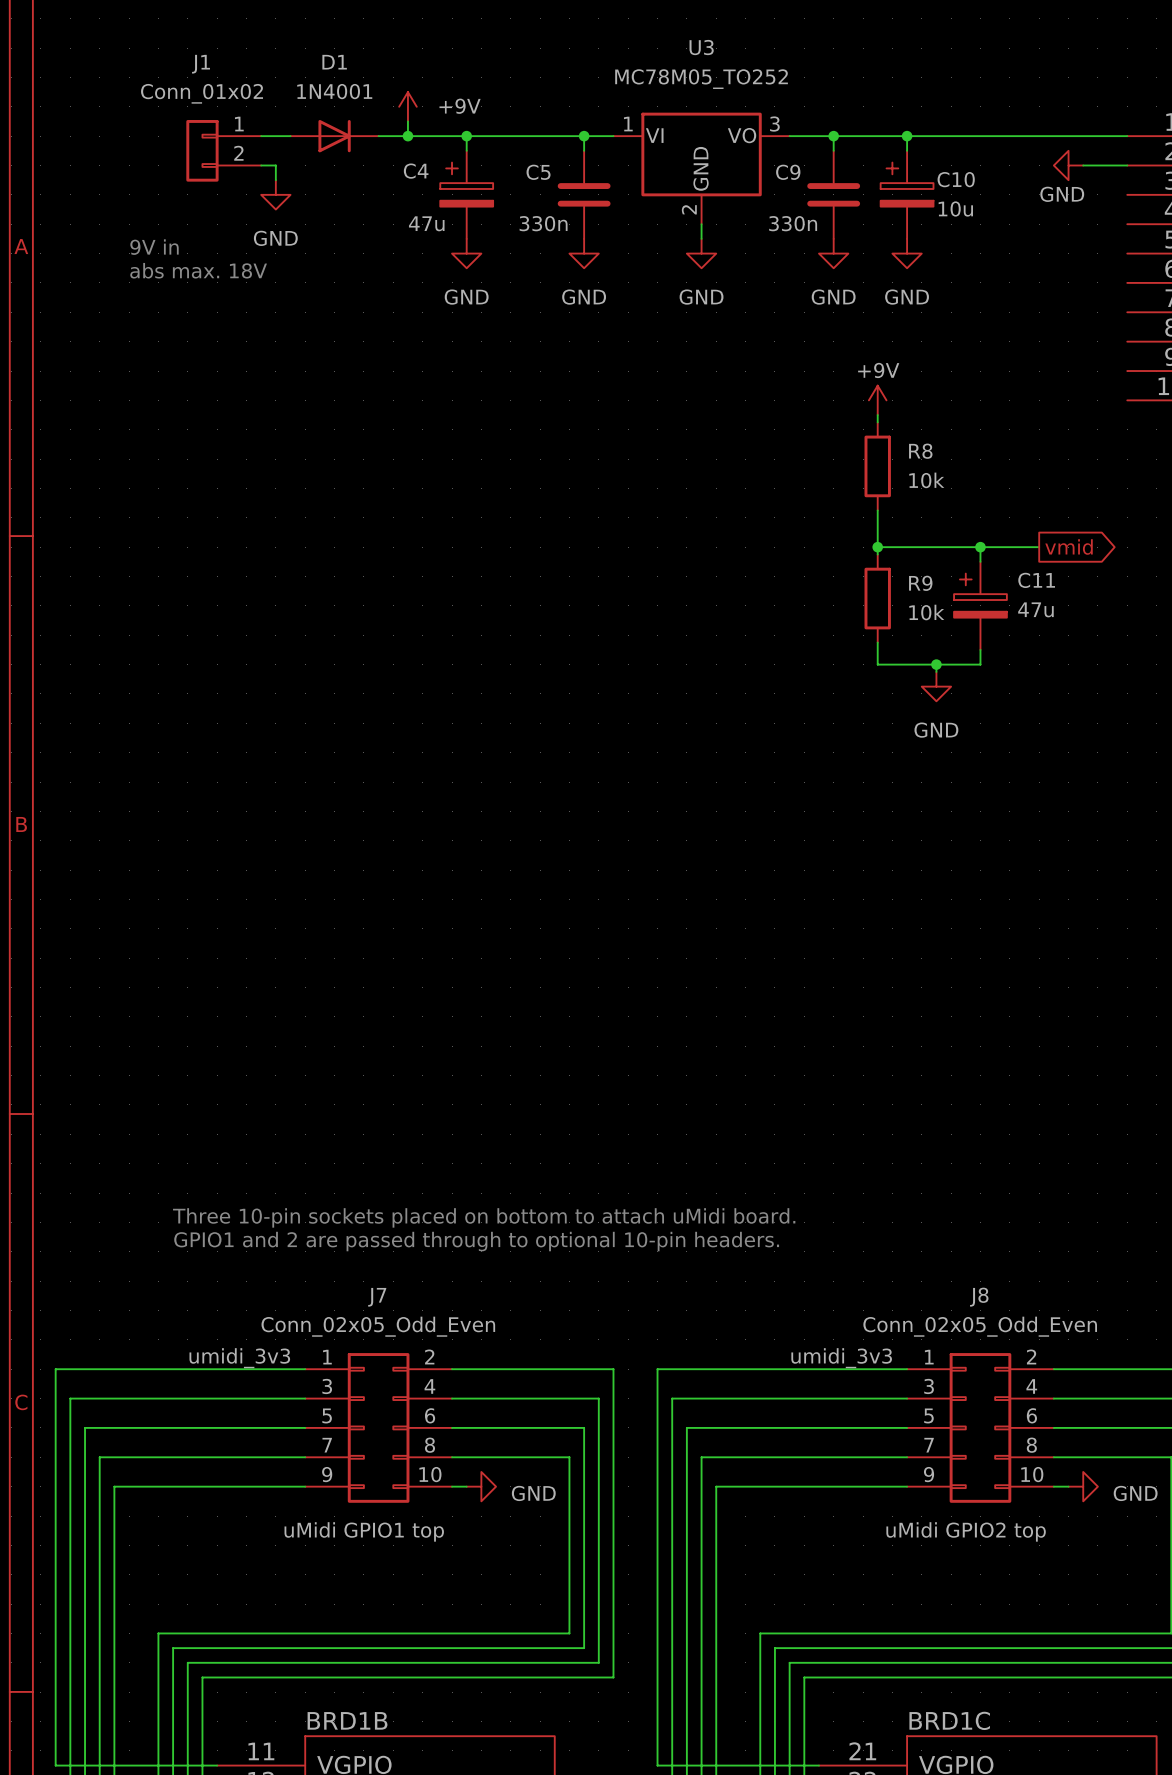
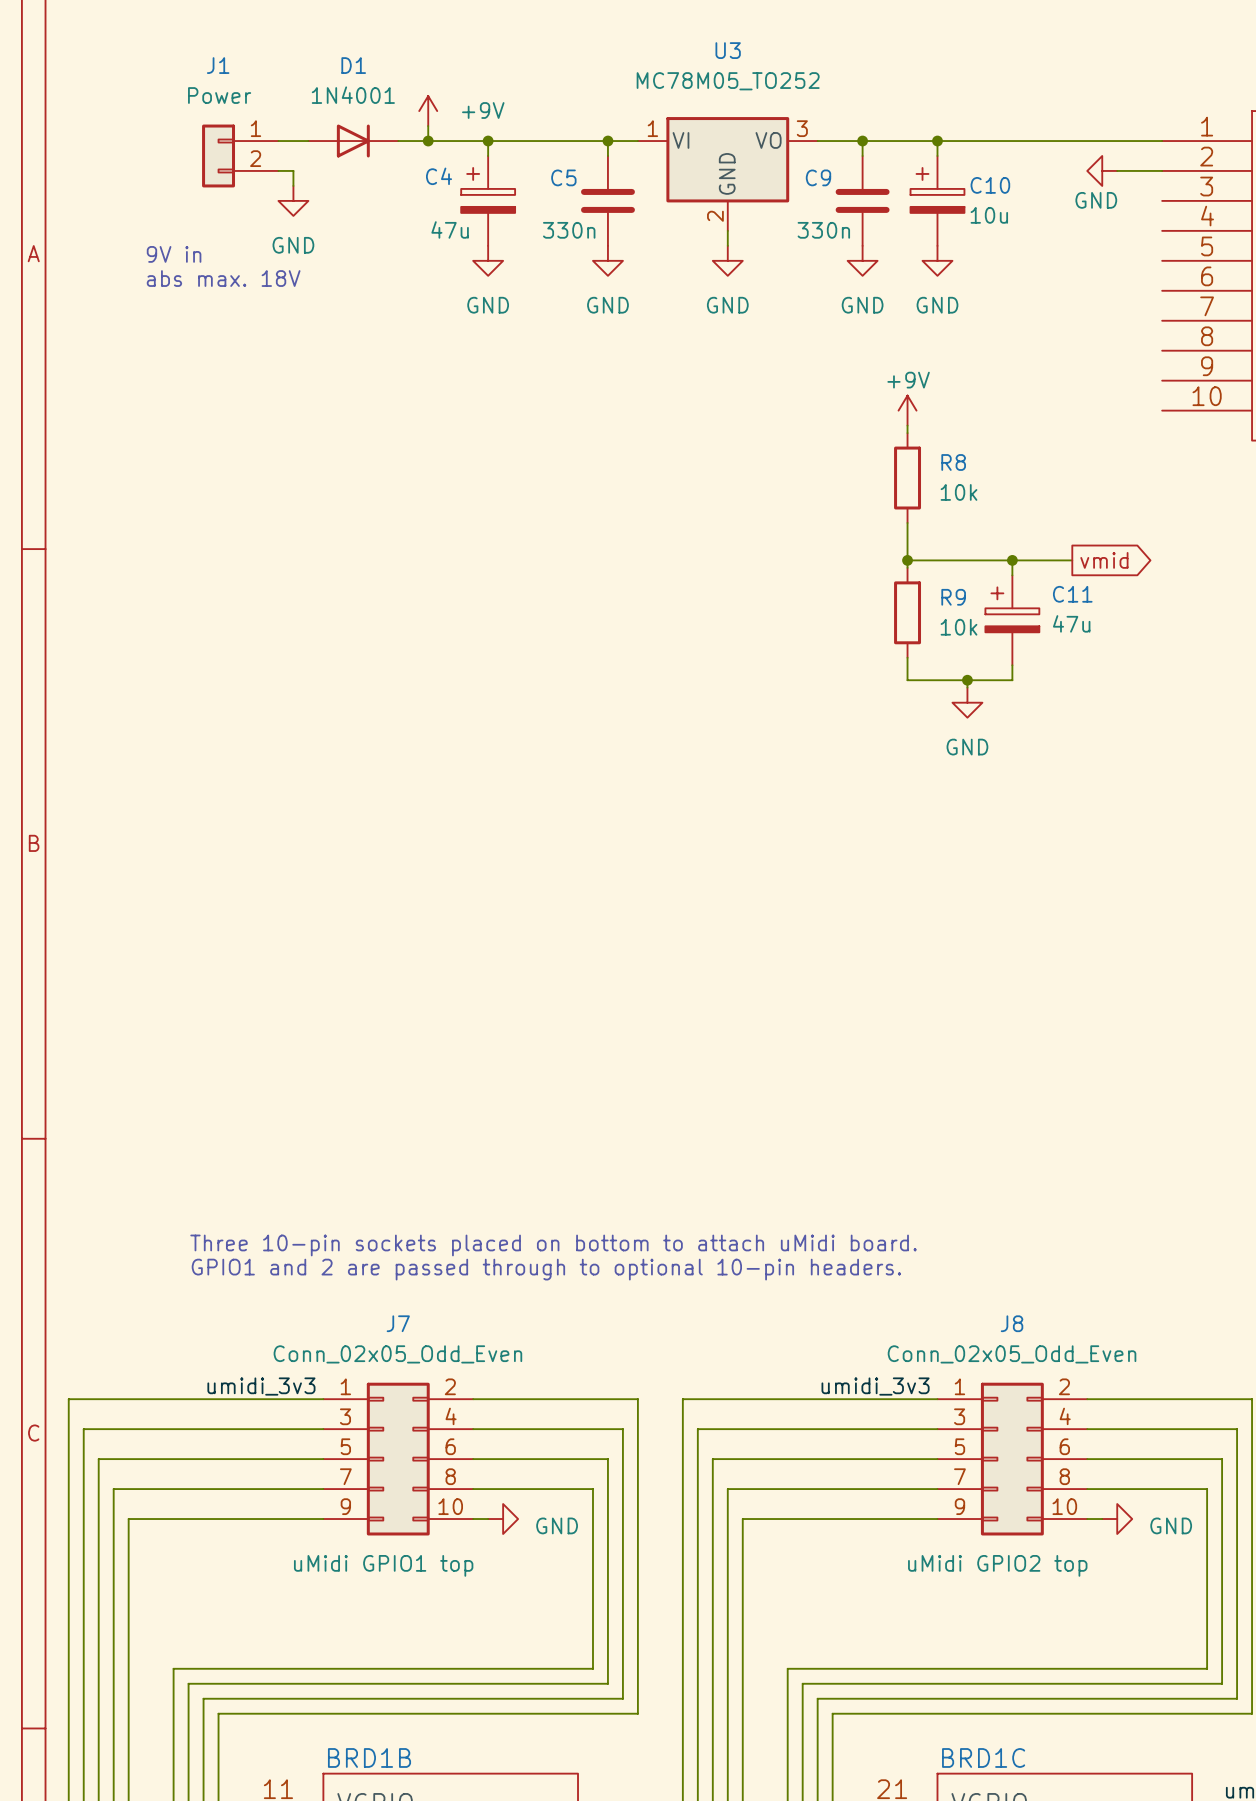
J1 value: Conn_01x02 (202, 93) -> Power (219, 95)

